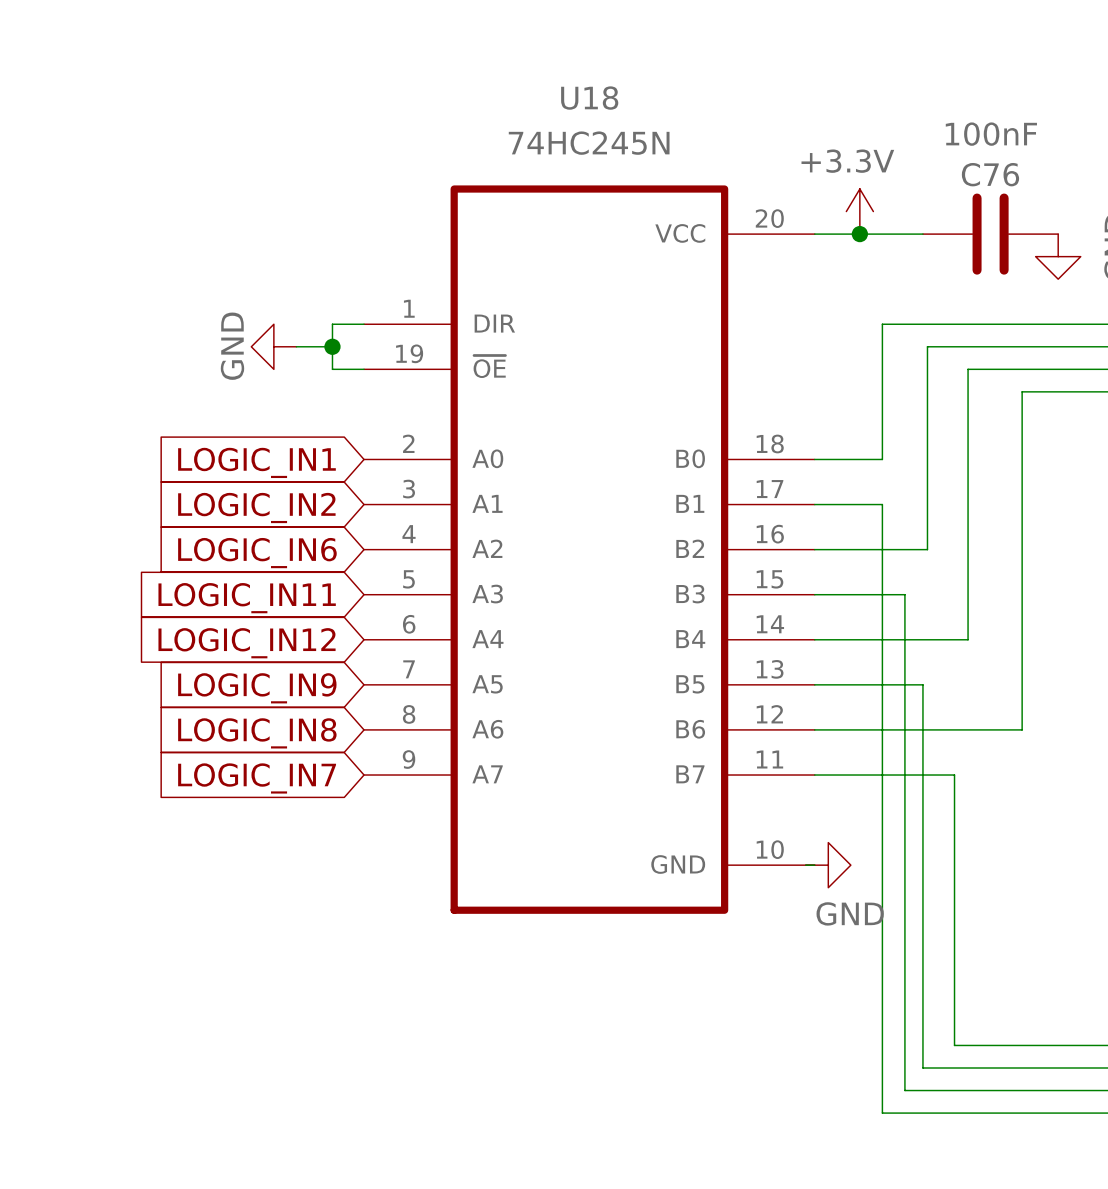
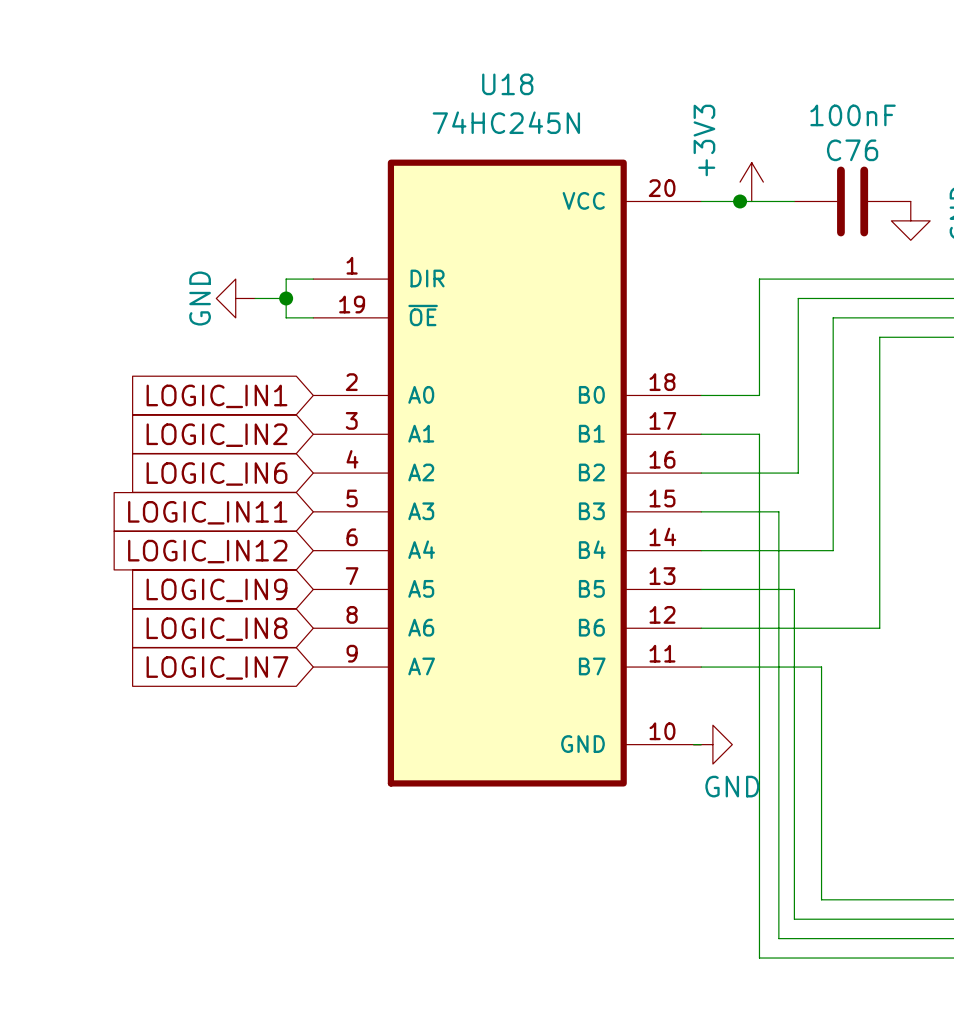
power symbol: +3.3V (859, 211) -> +3V3 (751, 182)

